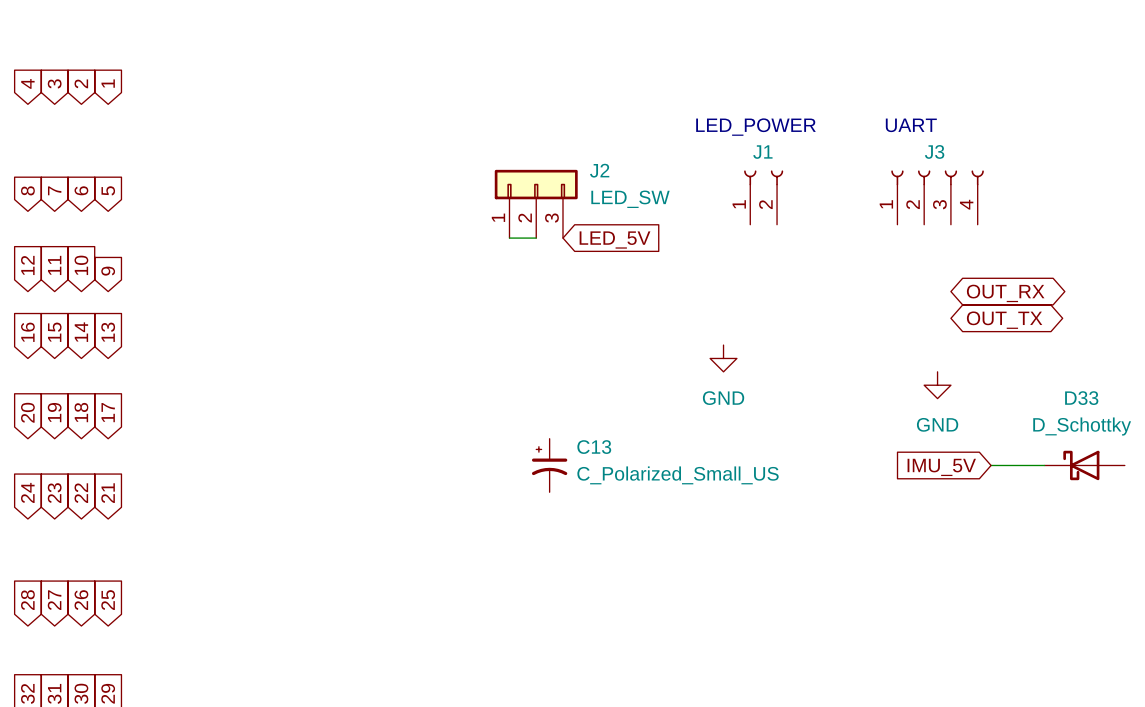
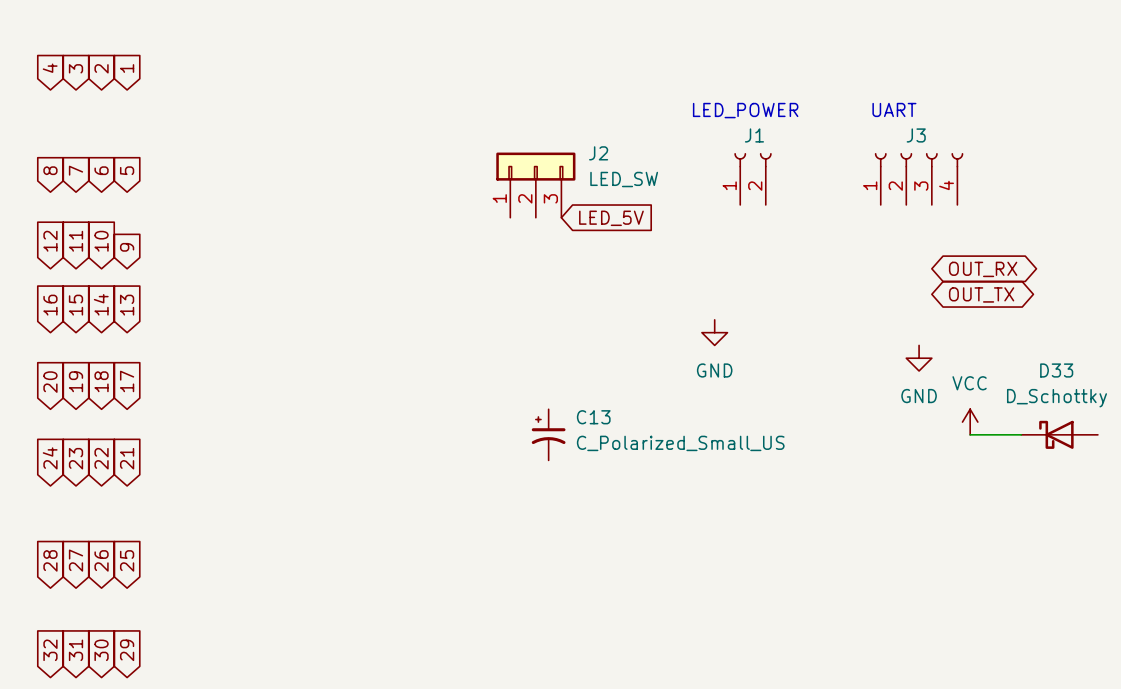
wire: (509, 238) (536, 238) -> none
power symbol: none -> VCC (970, 422)
global label: IMU_5V (941, 467) -> none

